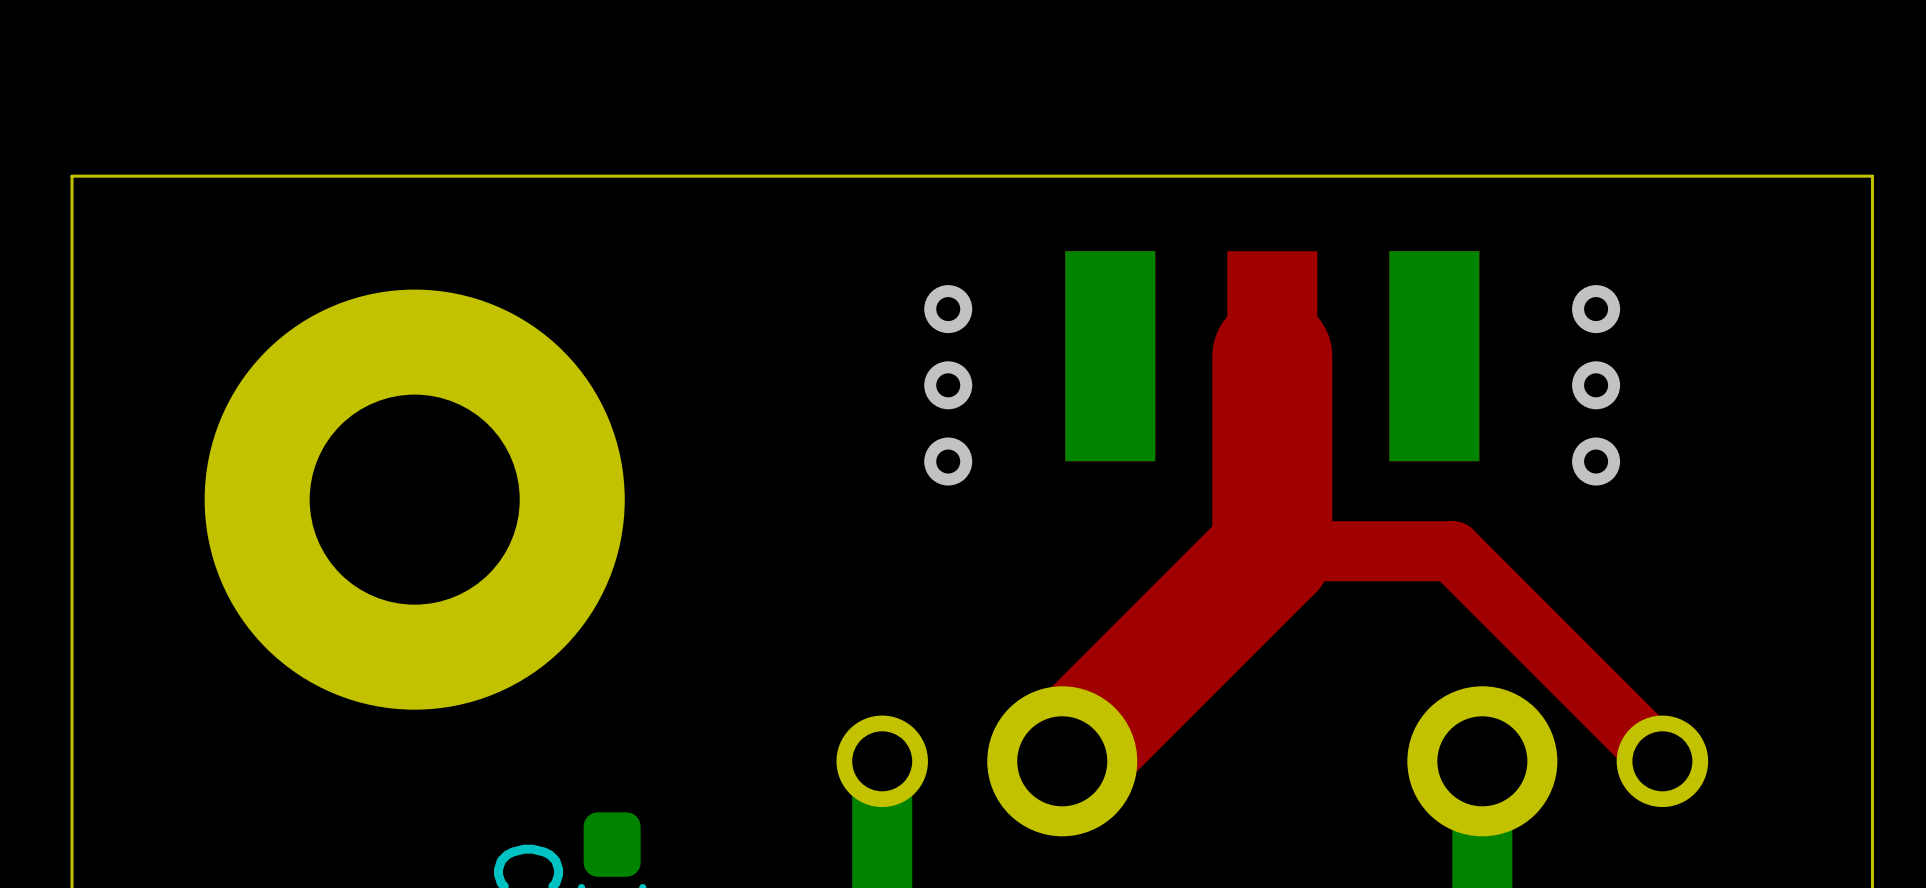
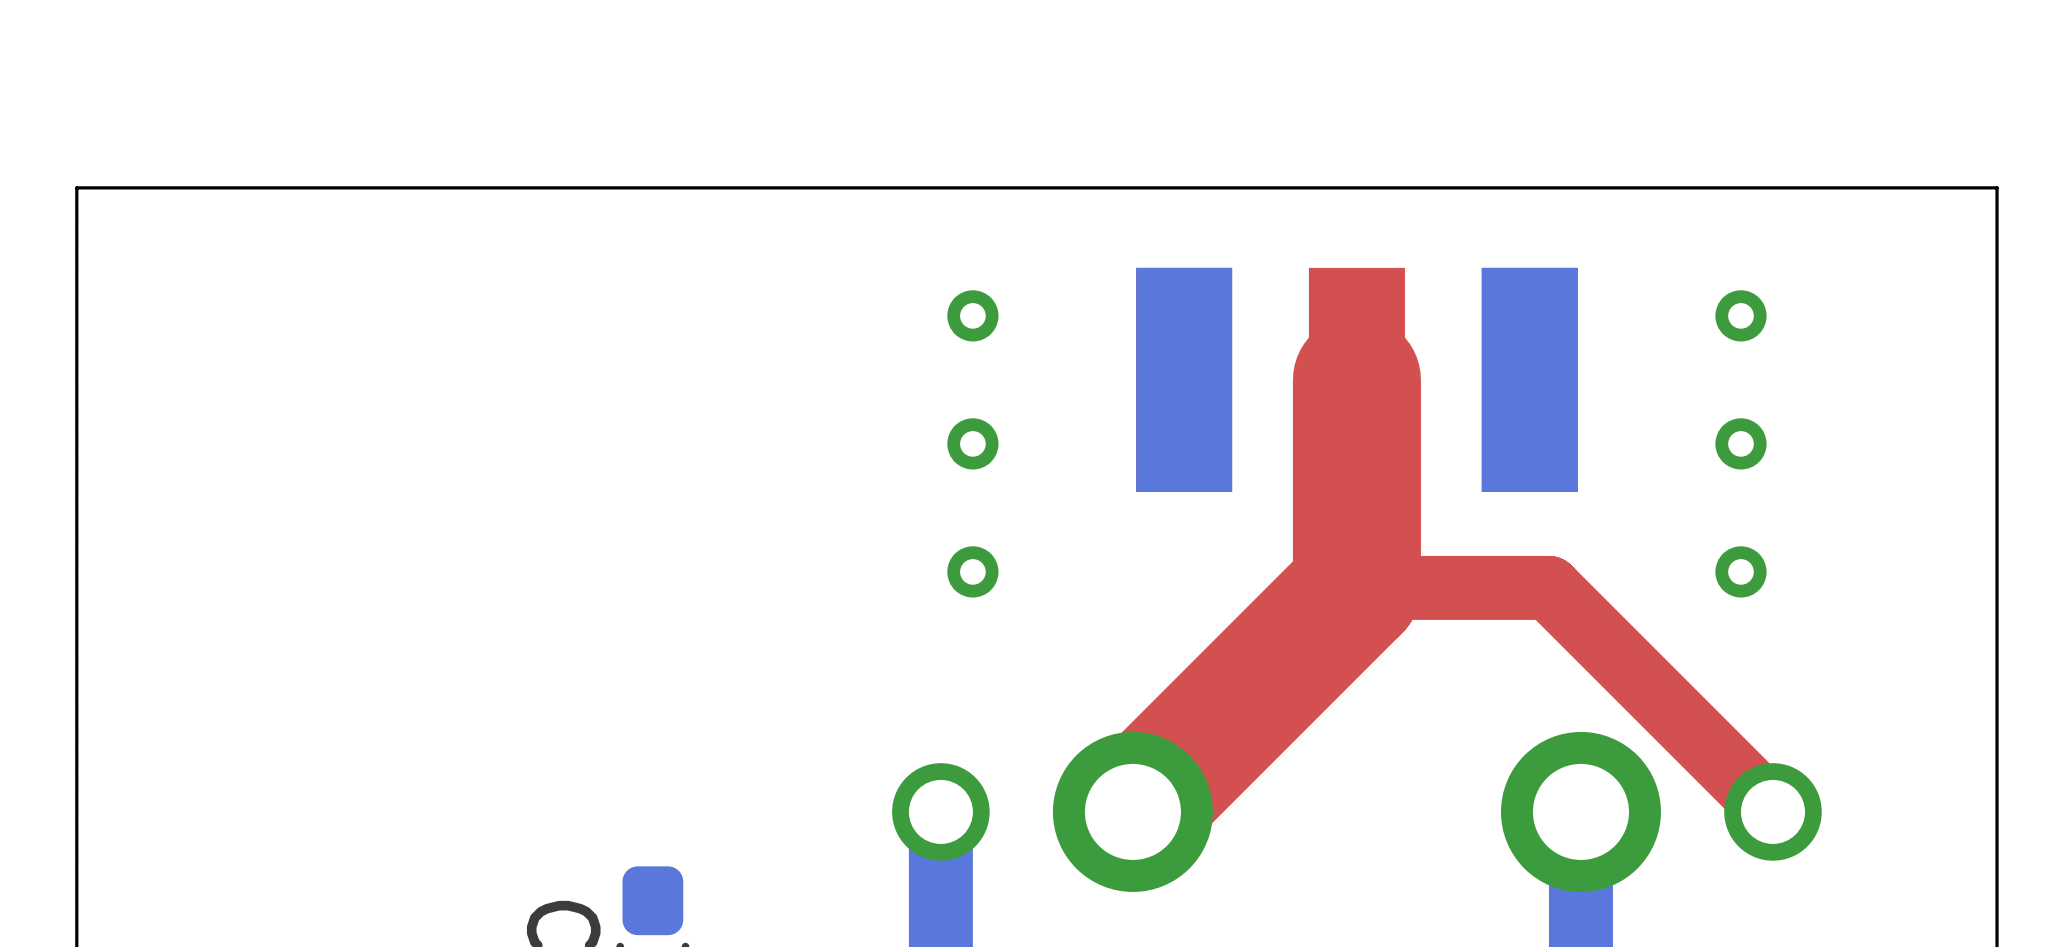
via position: (948, 309) -> (972, 315)
via position: (1596, 309) -> (1740, 315)
via: (948, 385) -> none
via: (1596, 385) -> none
via: none -> (972, 443)
via: none -> (1740, 443)
via: (948, 461) -> none
via: (1596, 461) -> none
part: (414, 499) -> none
via: none -> (972, 571)
via: none -> (1740, 571)

